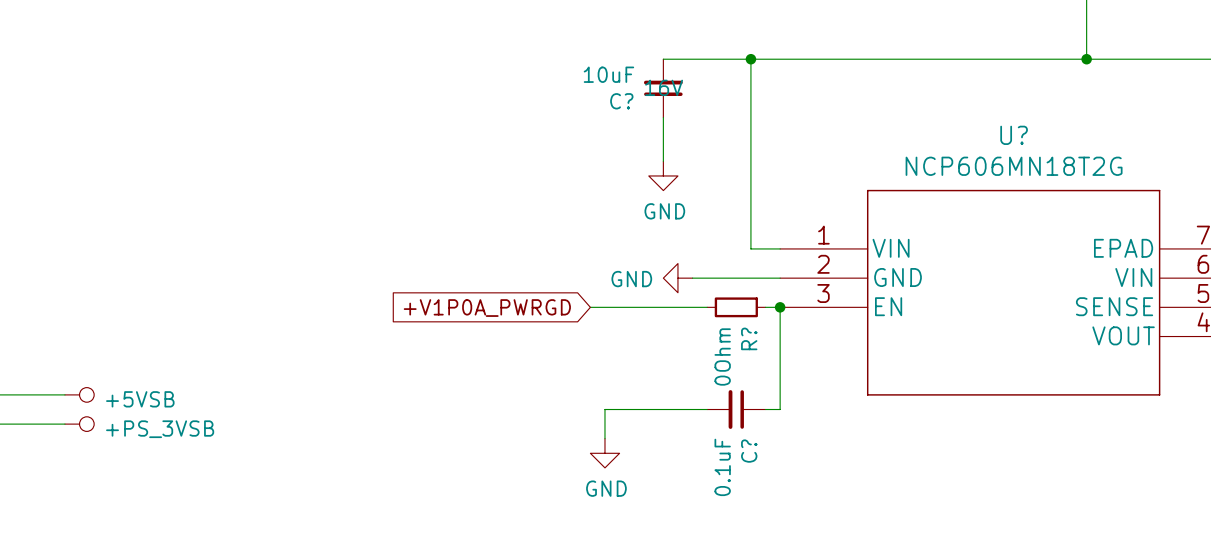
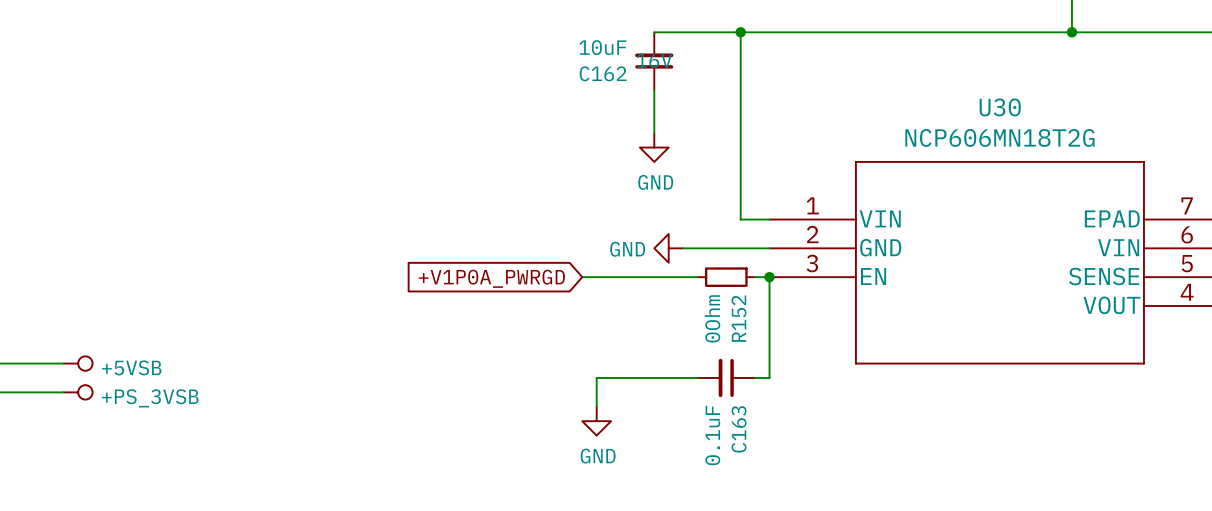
C? name: C? (621, 101) -> C162 (603, 73)
U? name: U? (1014, 135) -> U30 (1000, 107)
R? name: R? (749, 338) -> R152 (739, 318)
C? name: C? (749, 451) -> C163 (739, 429)

